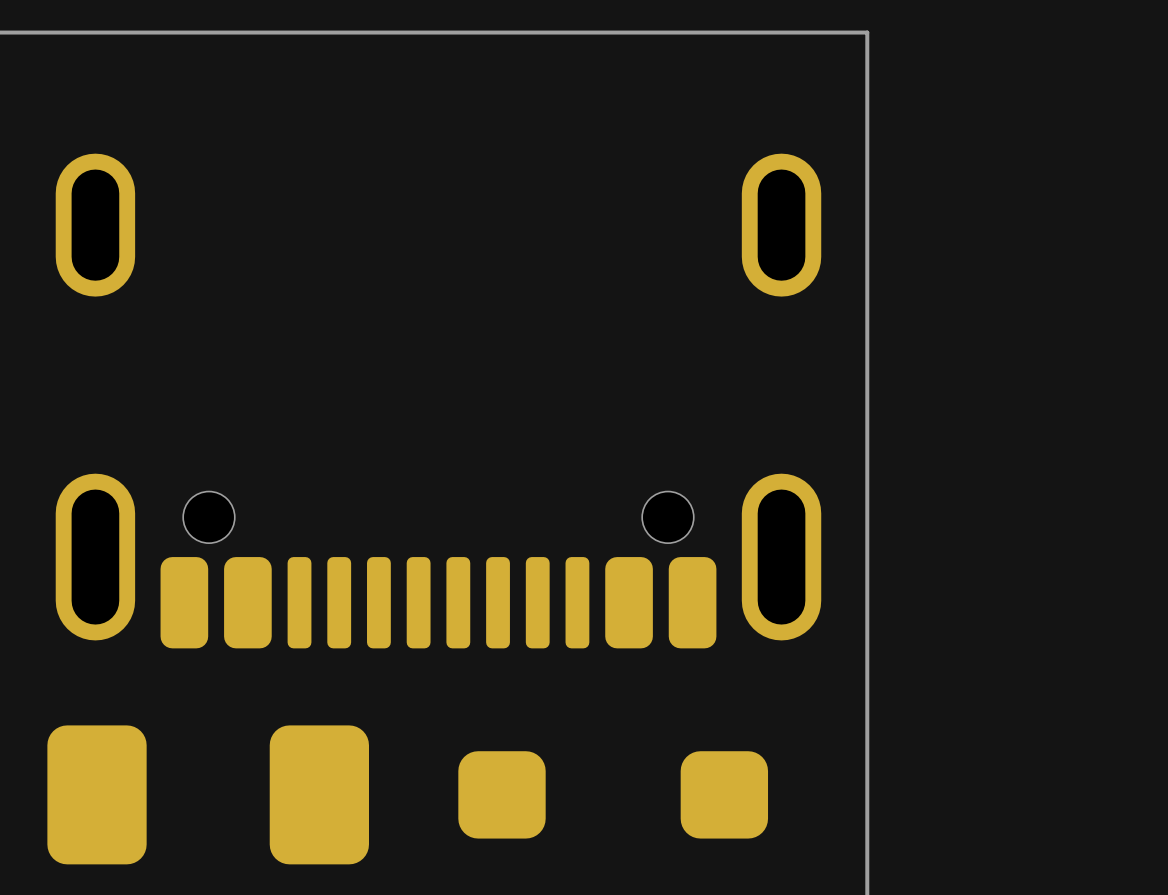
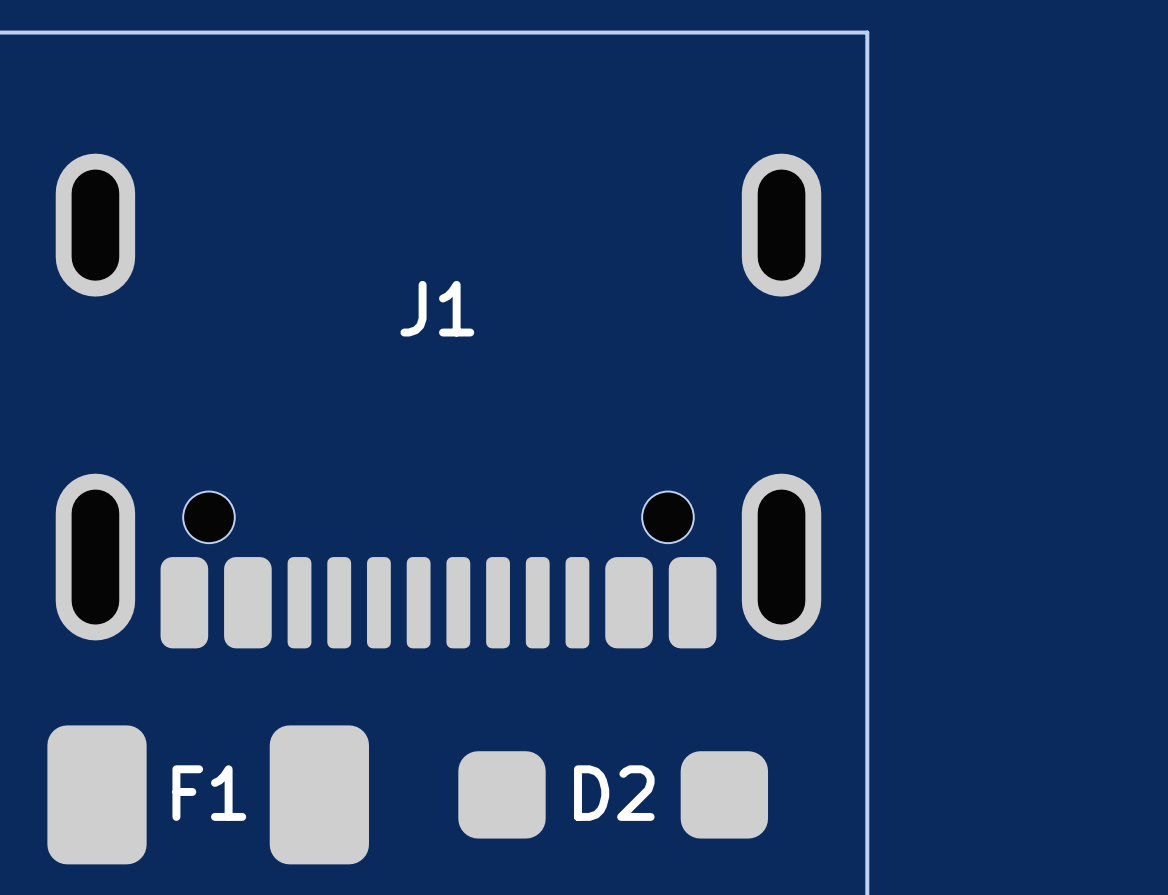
J1 name: none -> J1 (437, 308)
F1 name: none -> F1 (209, 793)
D2 name: none -> D2 (614, 793)

